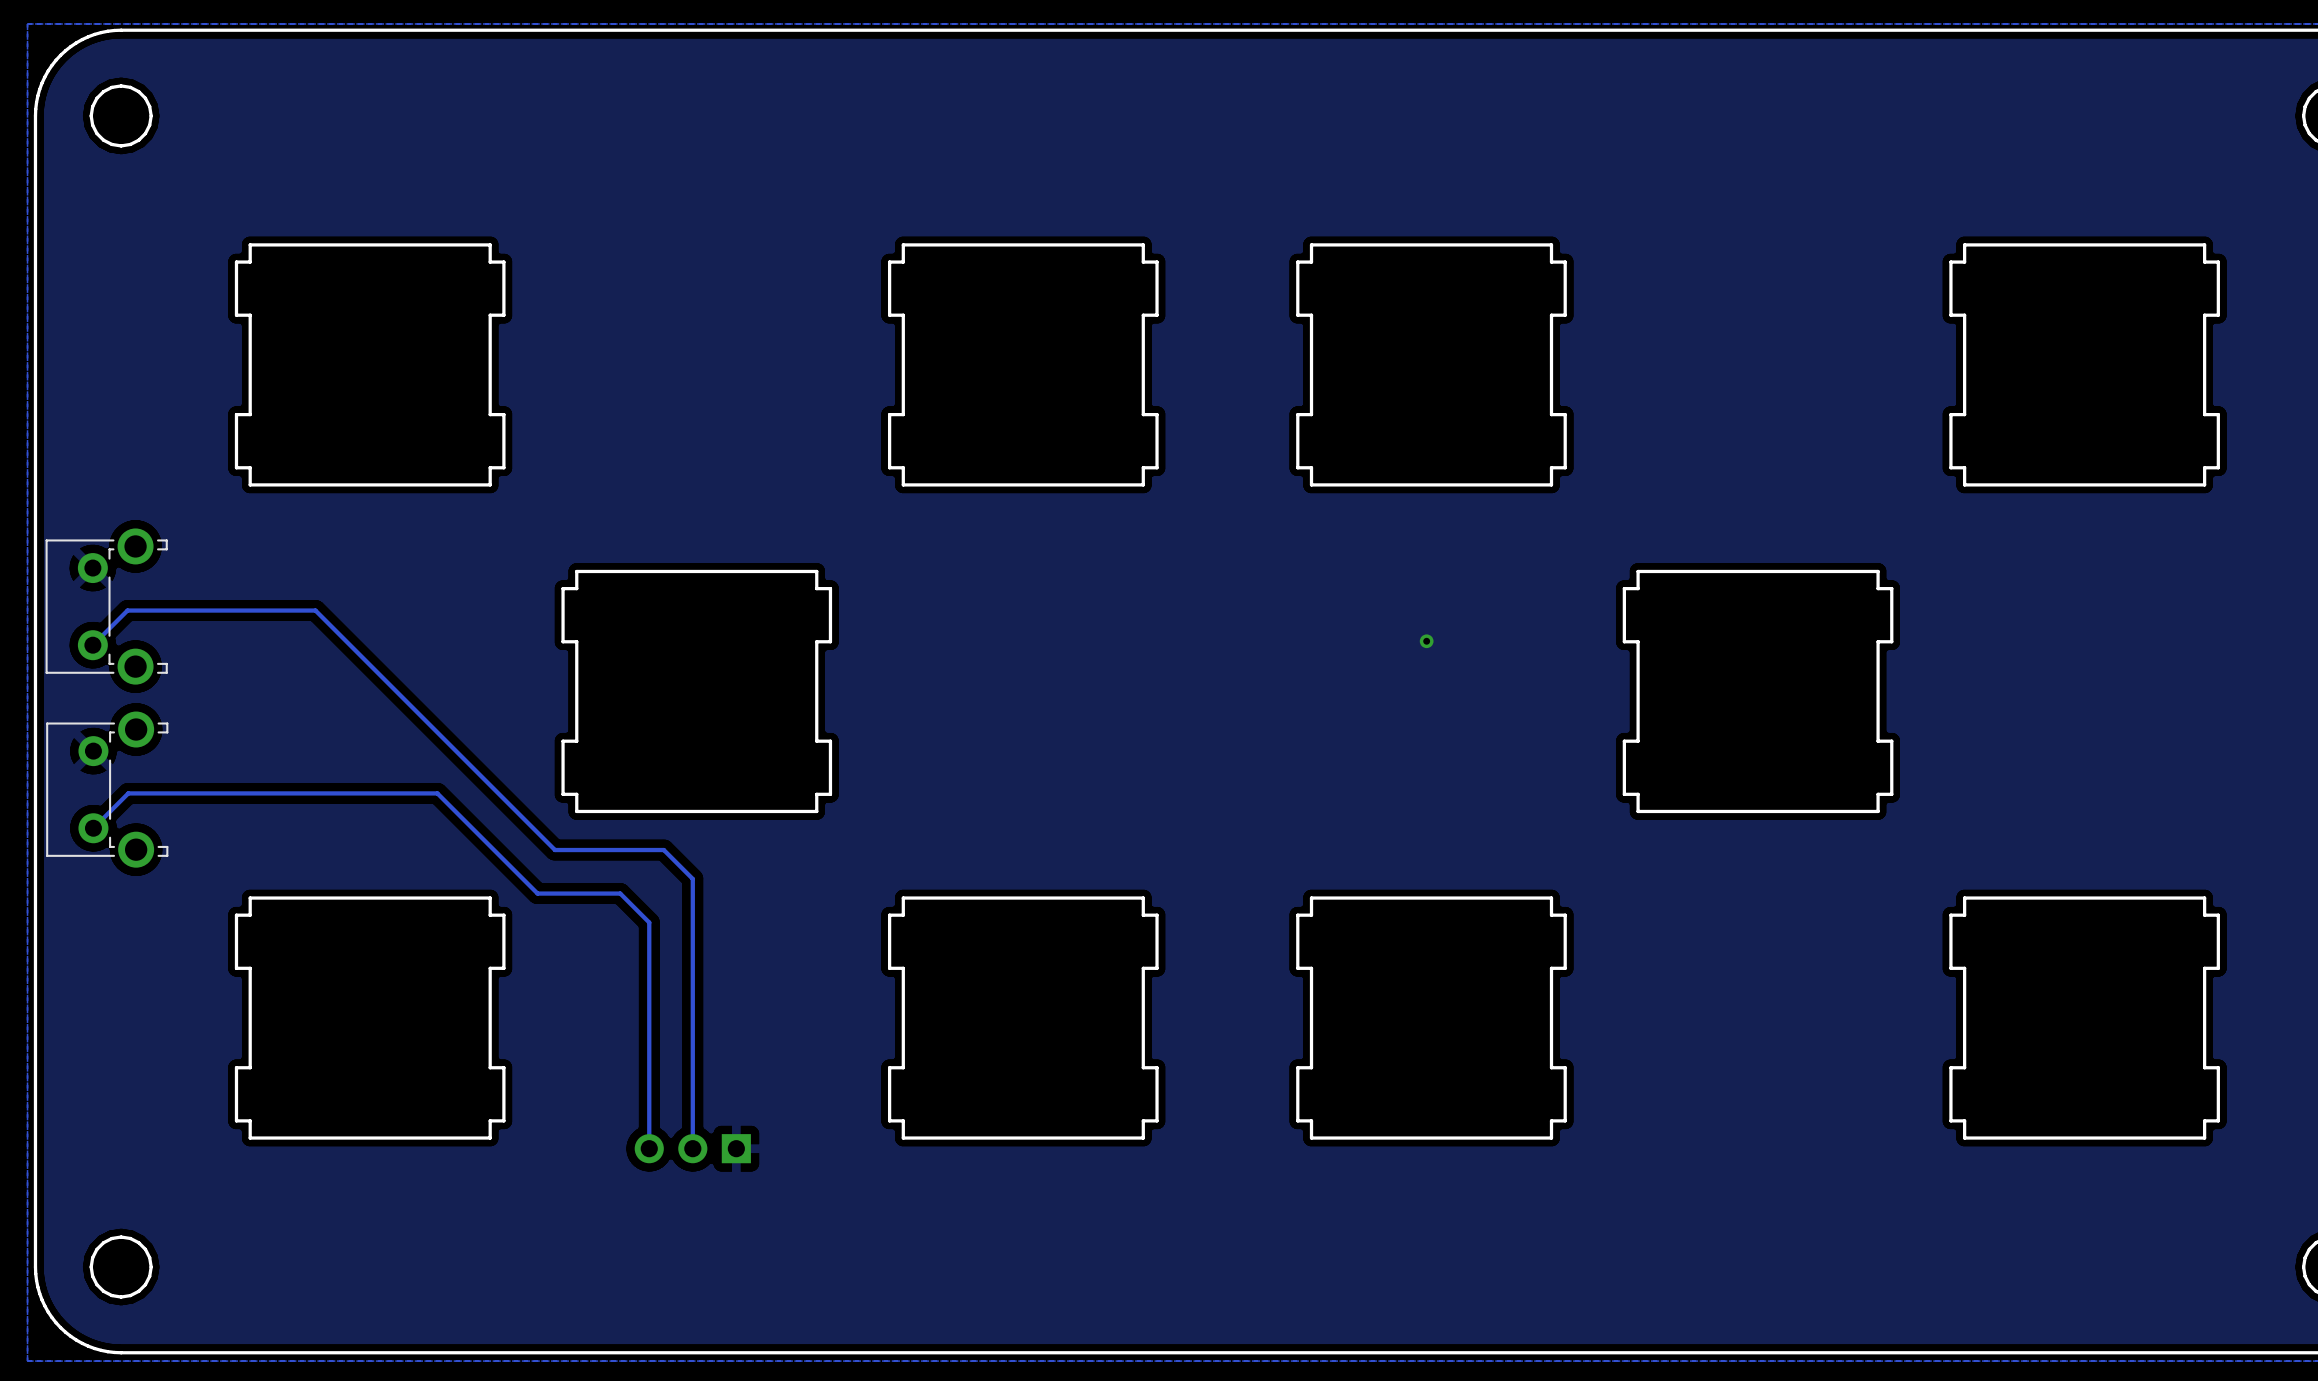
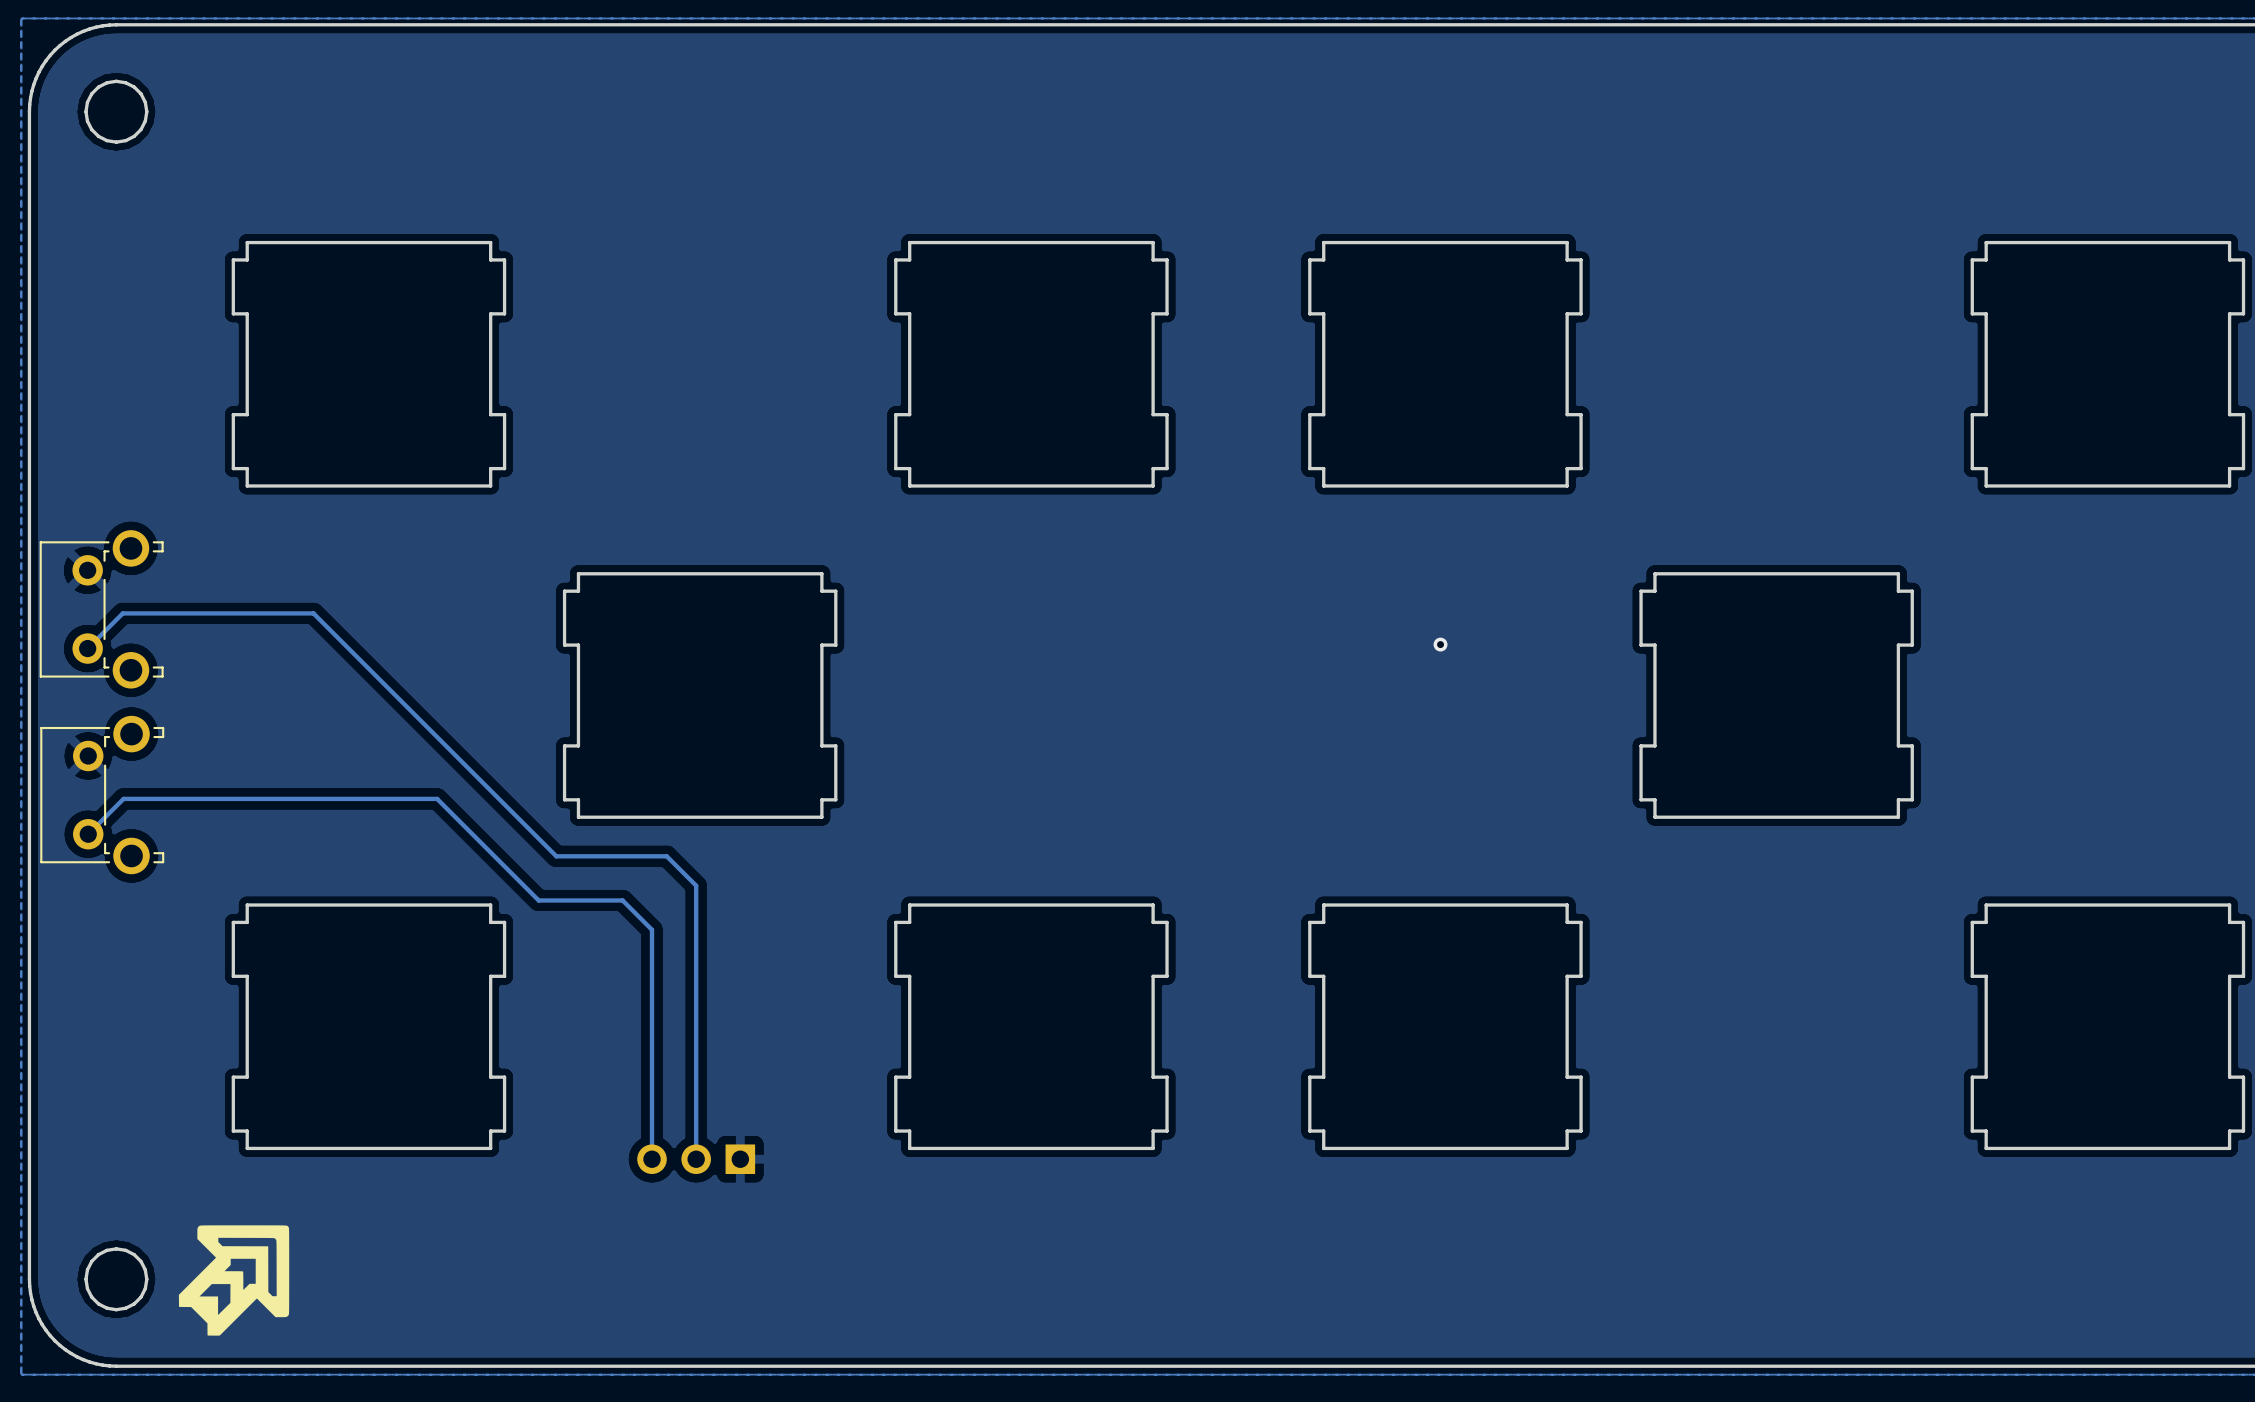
drawing: none -> [178, 1225, 290, 1336]

